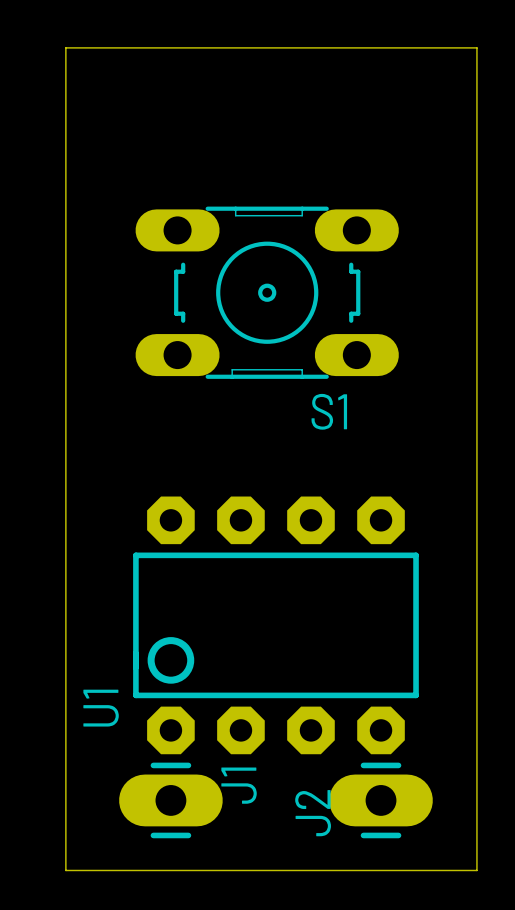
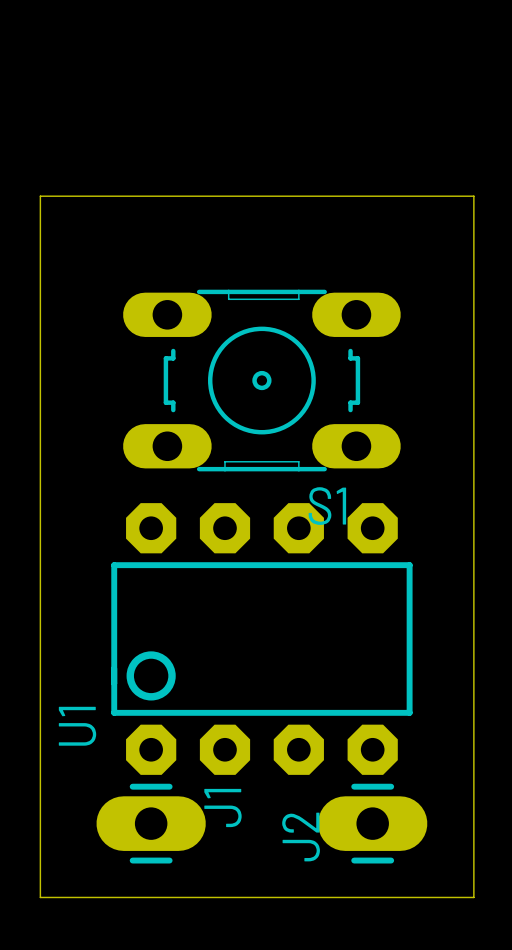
board edge: (65, 205) (65, 47) (476, 47) (476, 205) -> (40, 196) (473, 196)
S1 position: (267, 292) -> (261, 380)

